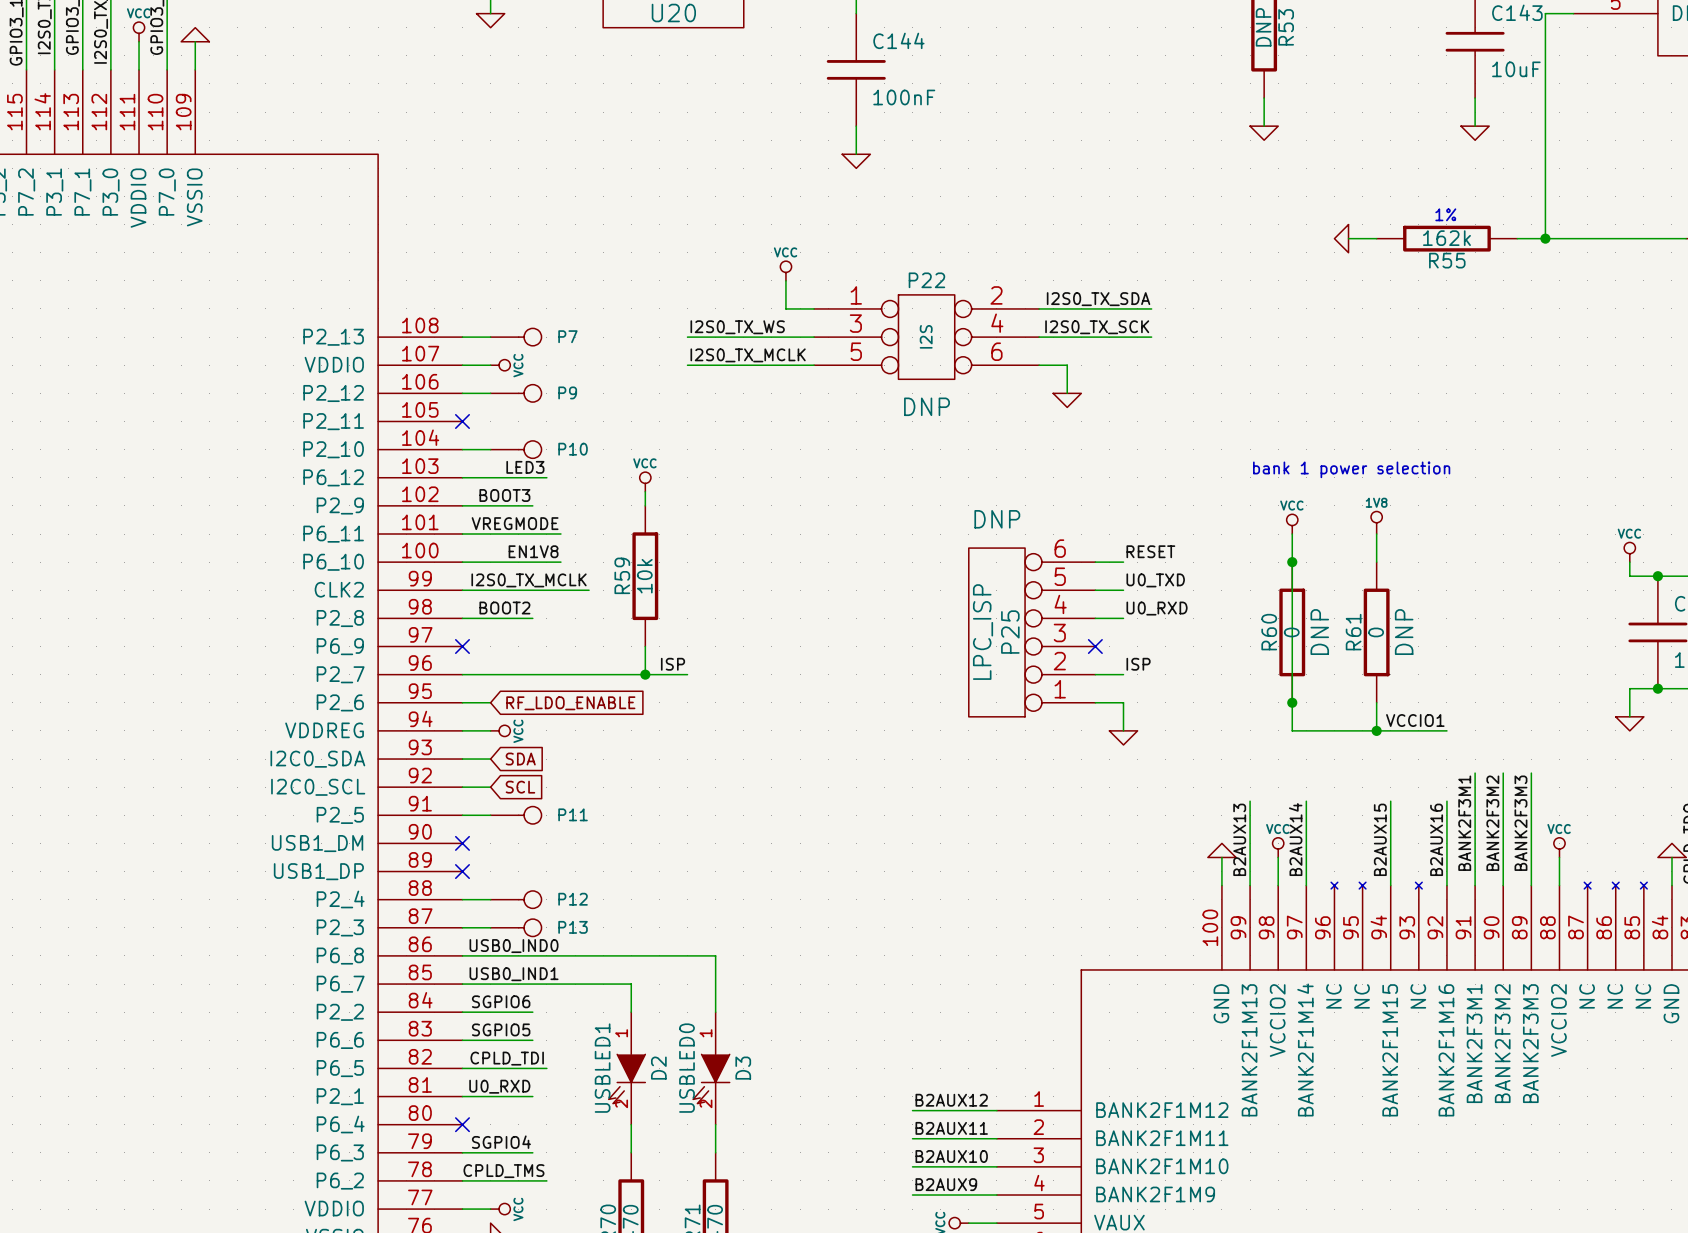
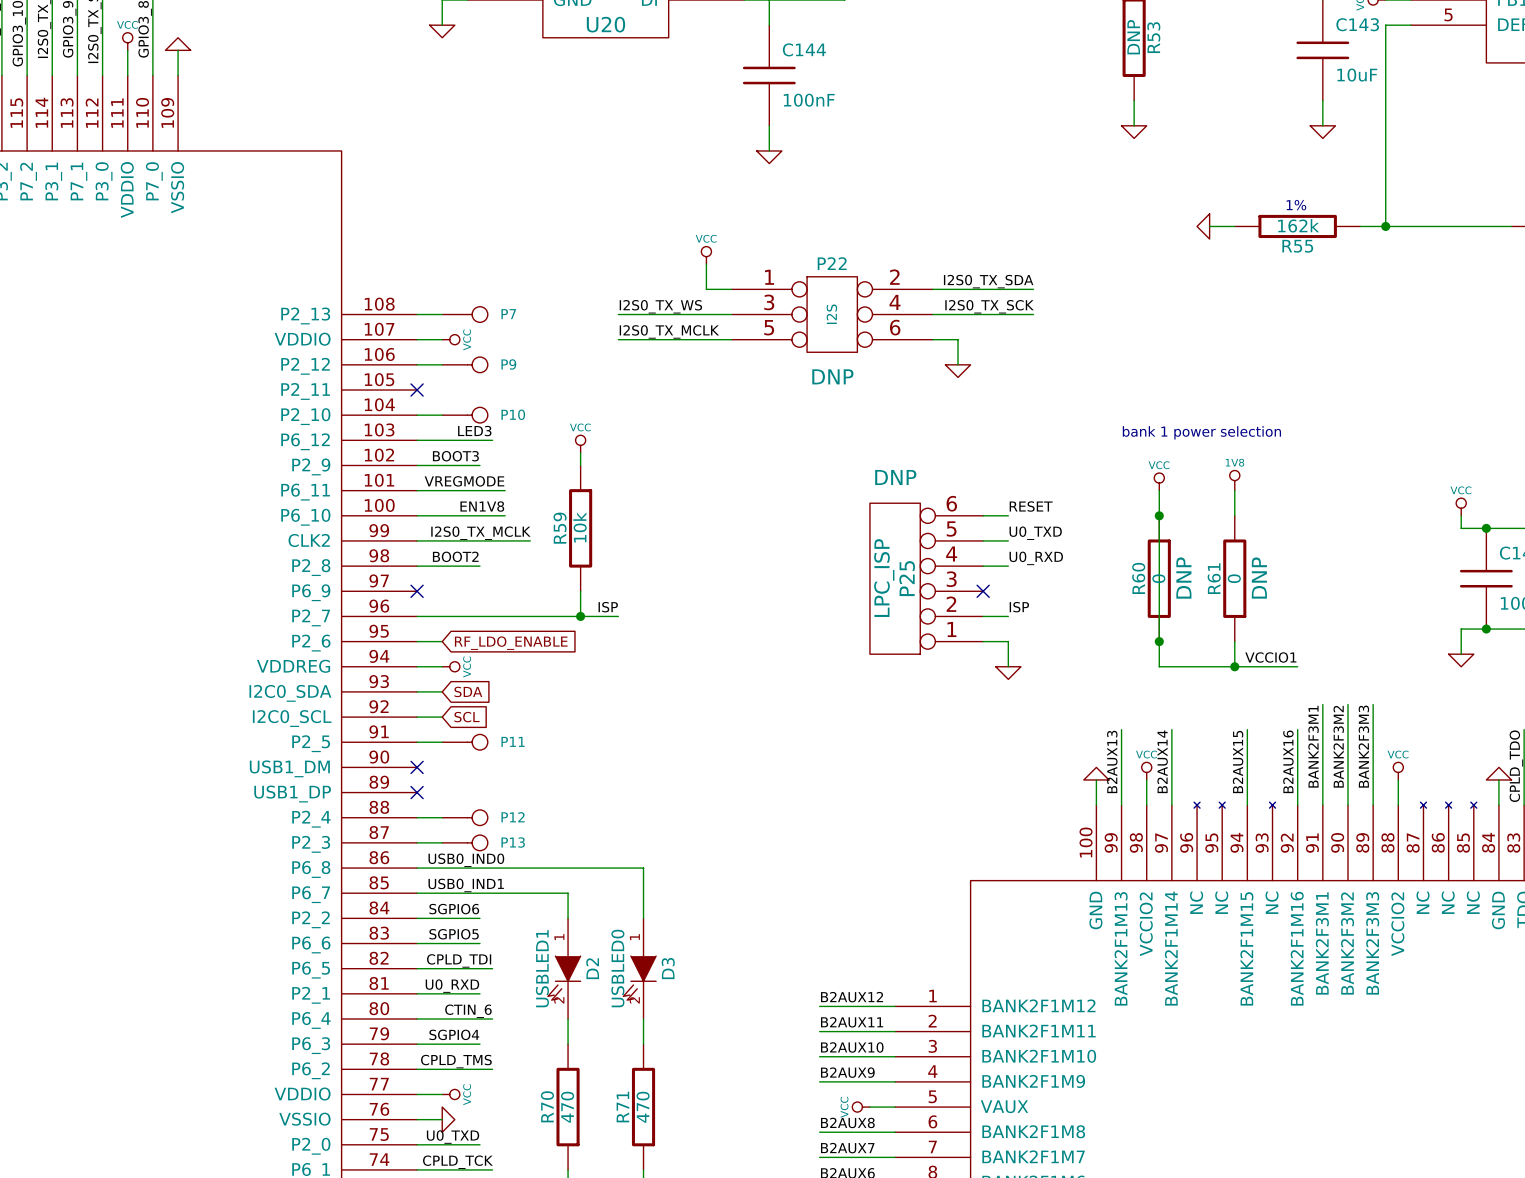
label: none -> CTIN_6 (468, 1011)
wire: none -> (417, 1019) (492, 1019)
no-connect mark: (462, 1124) -> none

